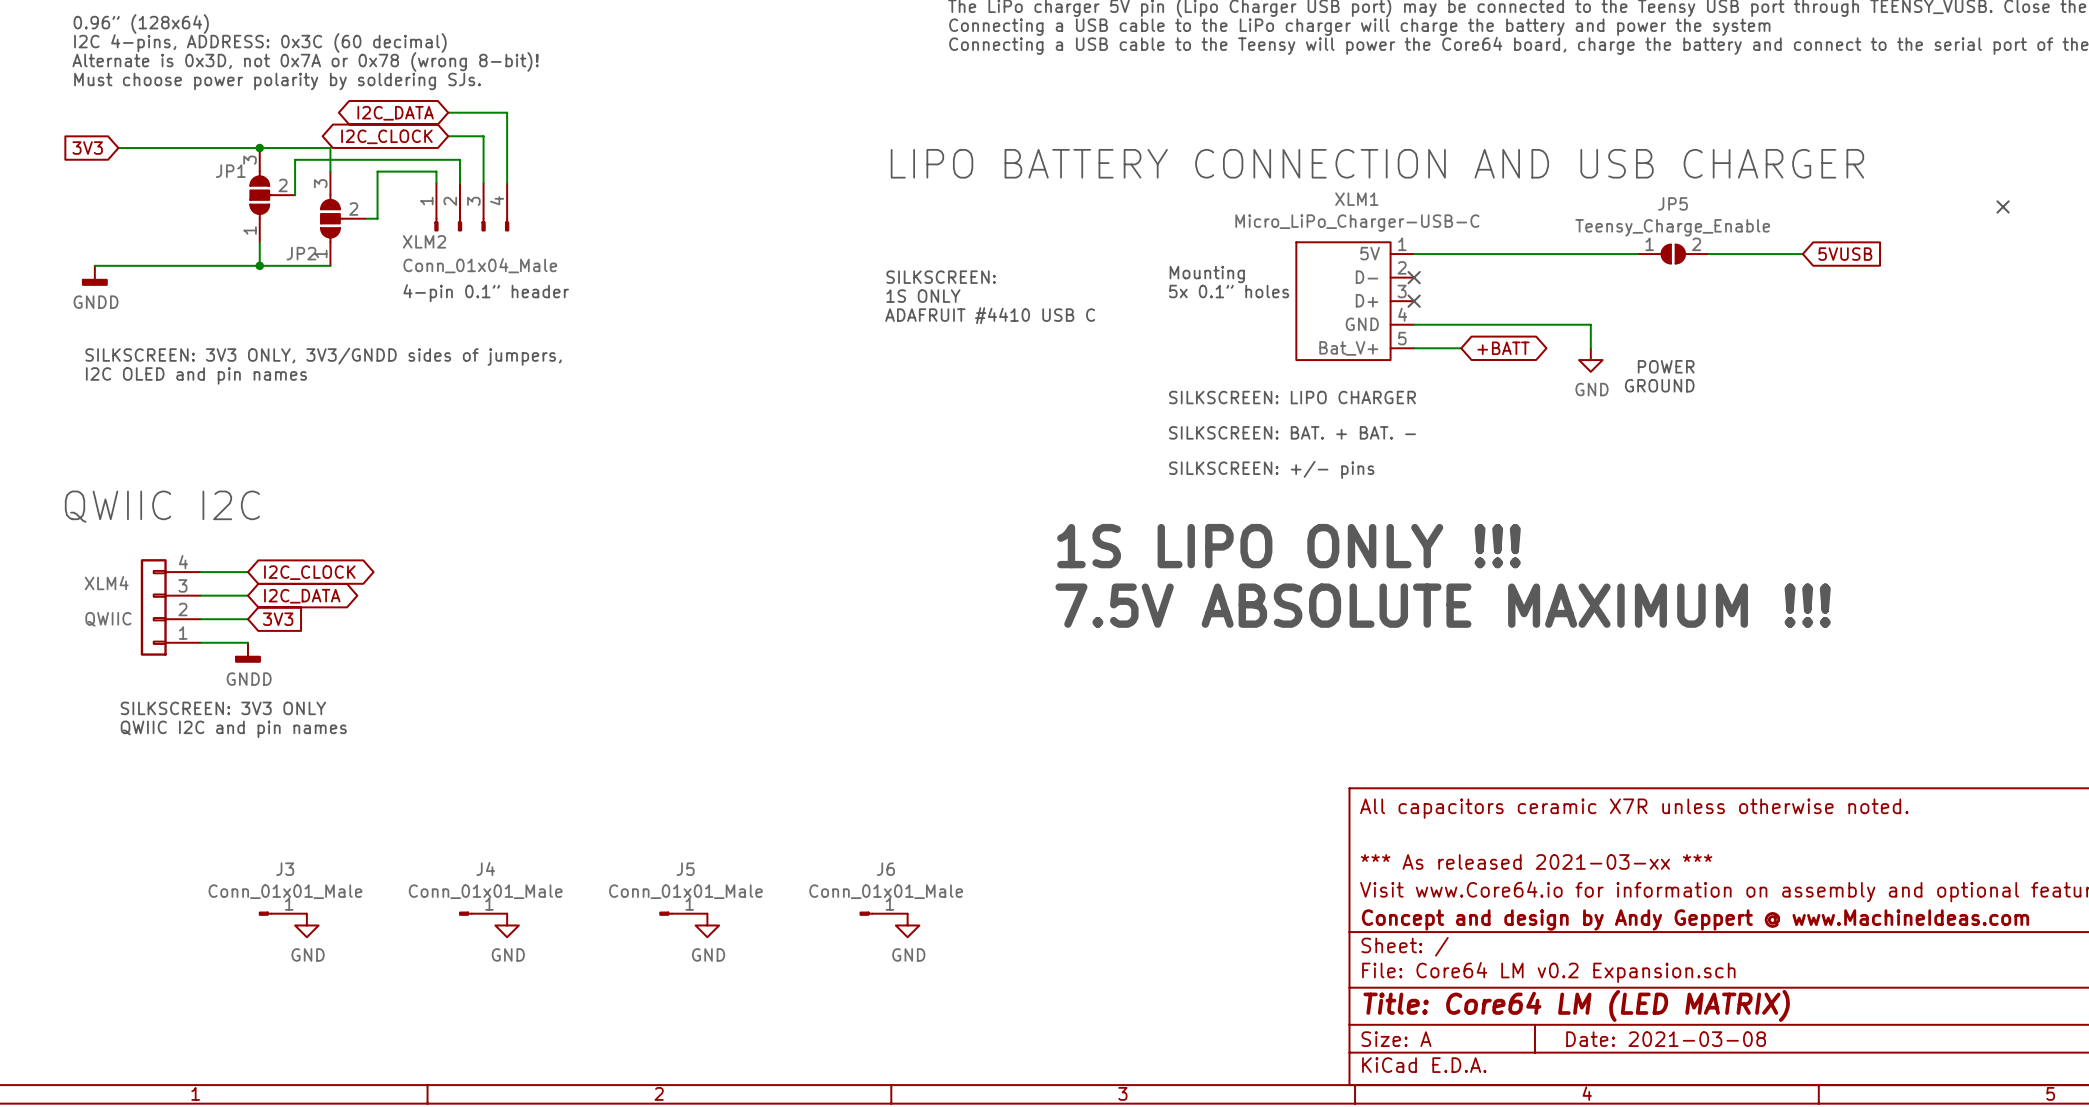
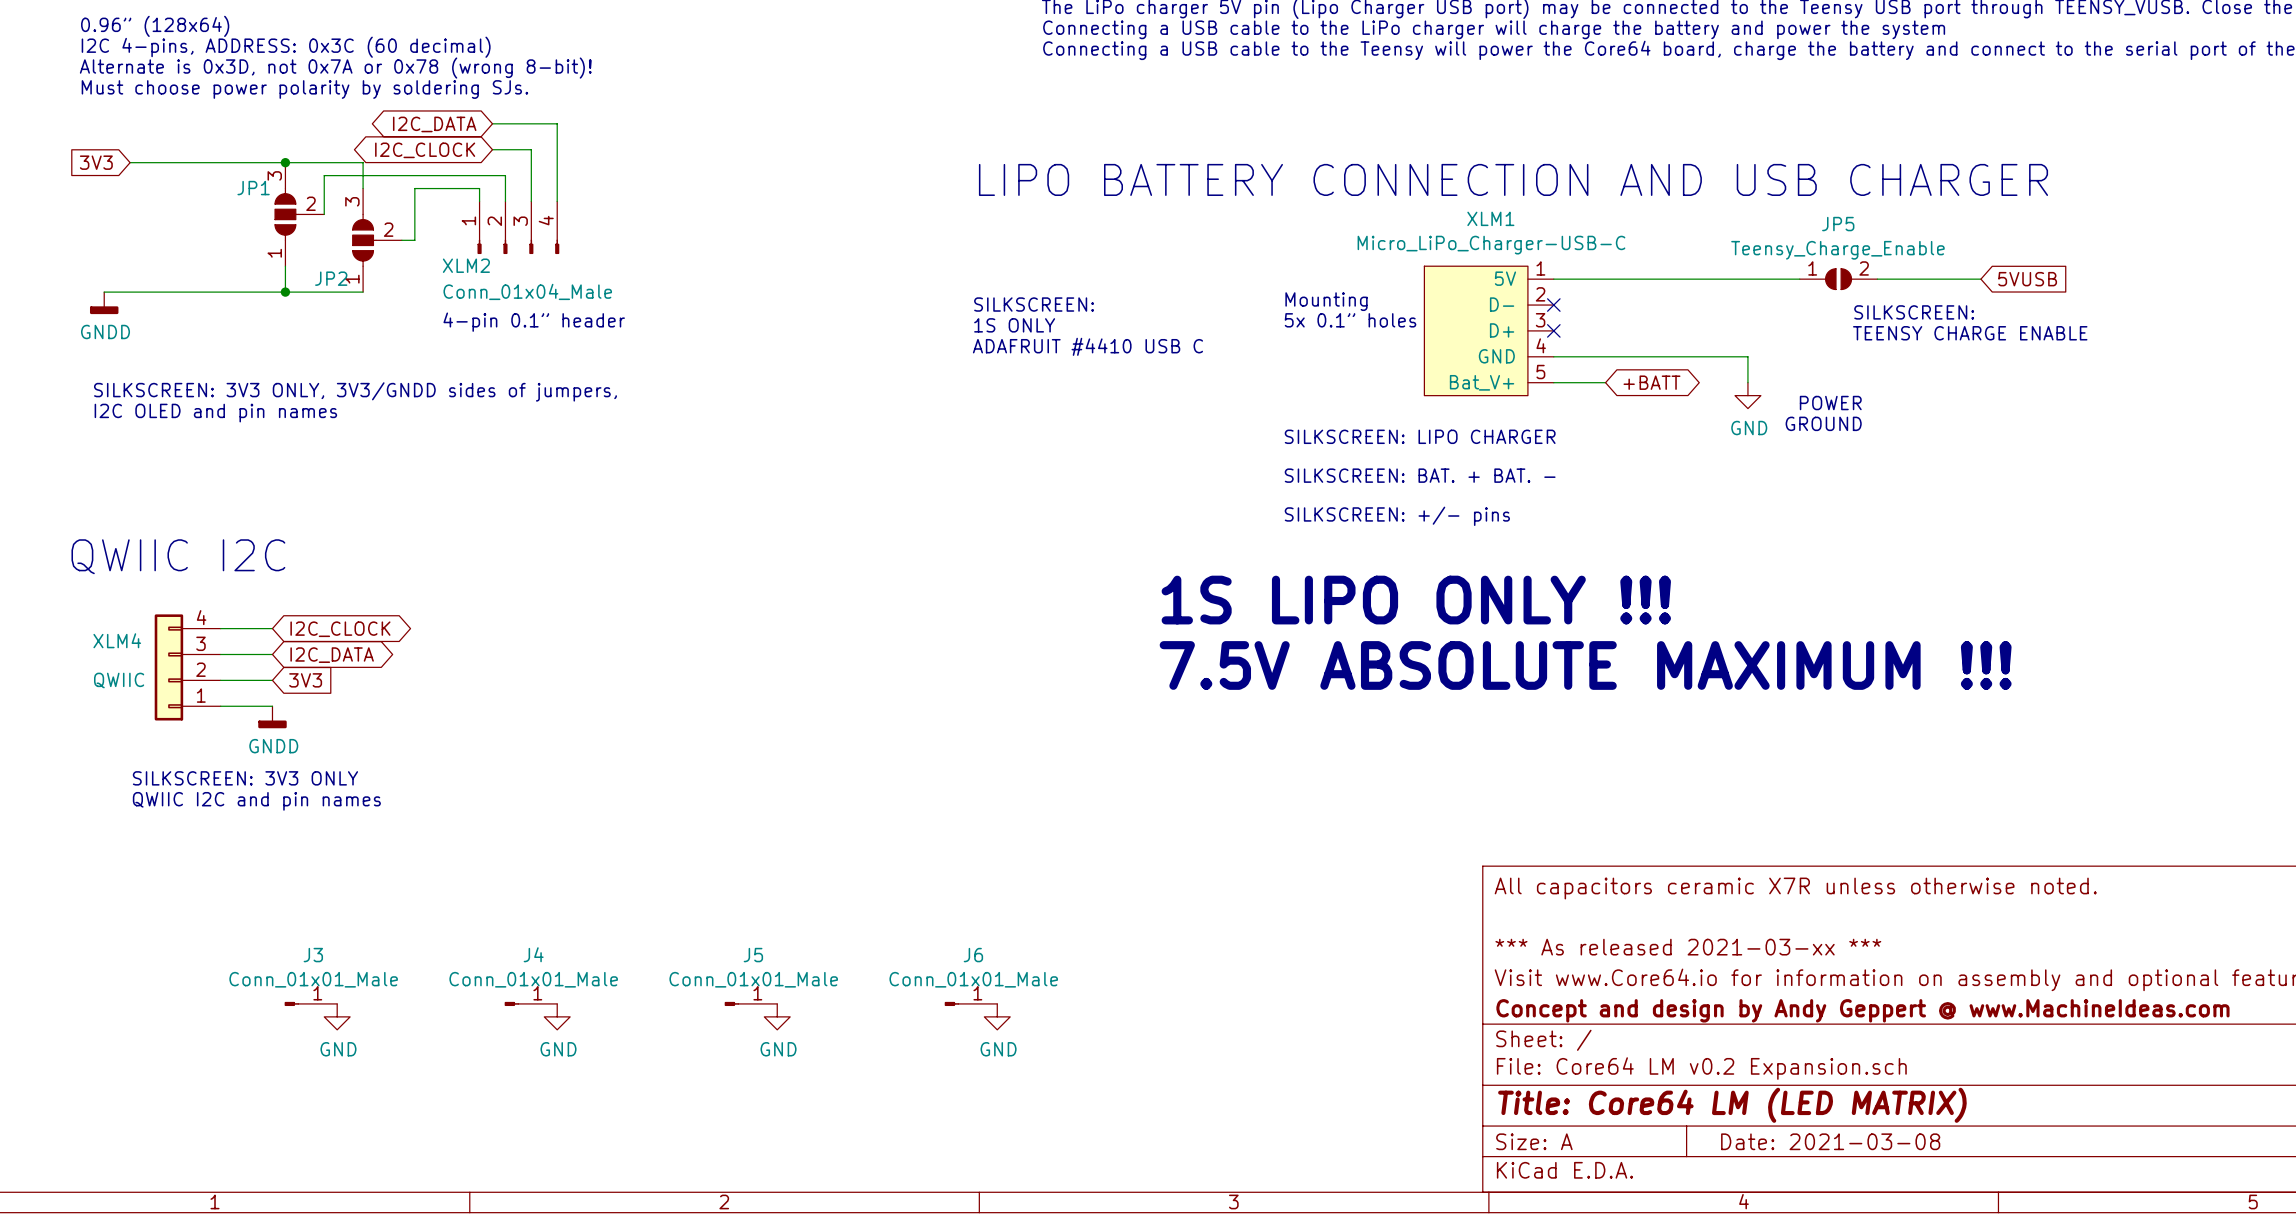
no-connect mark: (2003, 206) -> none
text: none -> SILKSCREEN: (1914, 312)
text: none -> TEENSY CHARGE ENABLE (1970, 333)

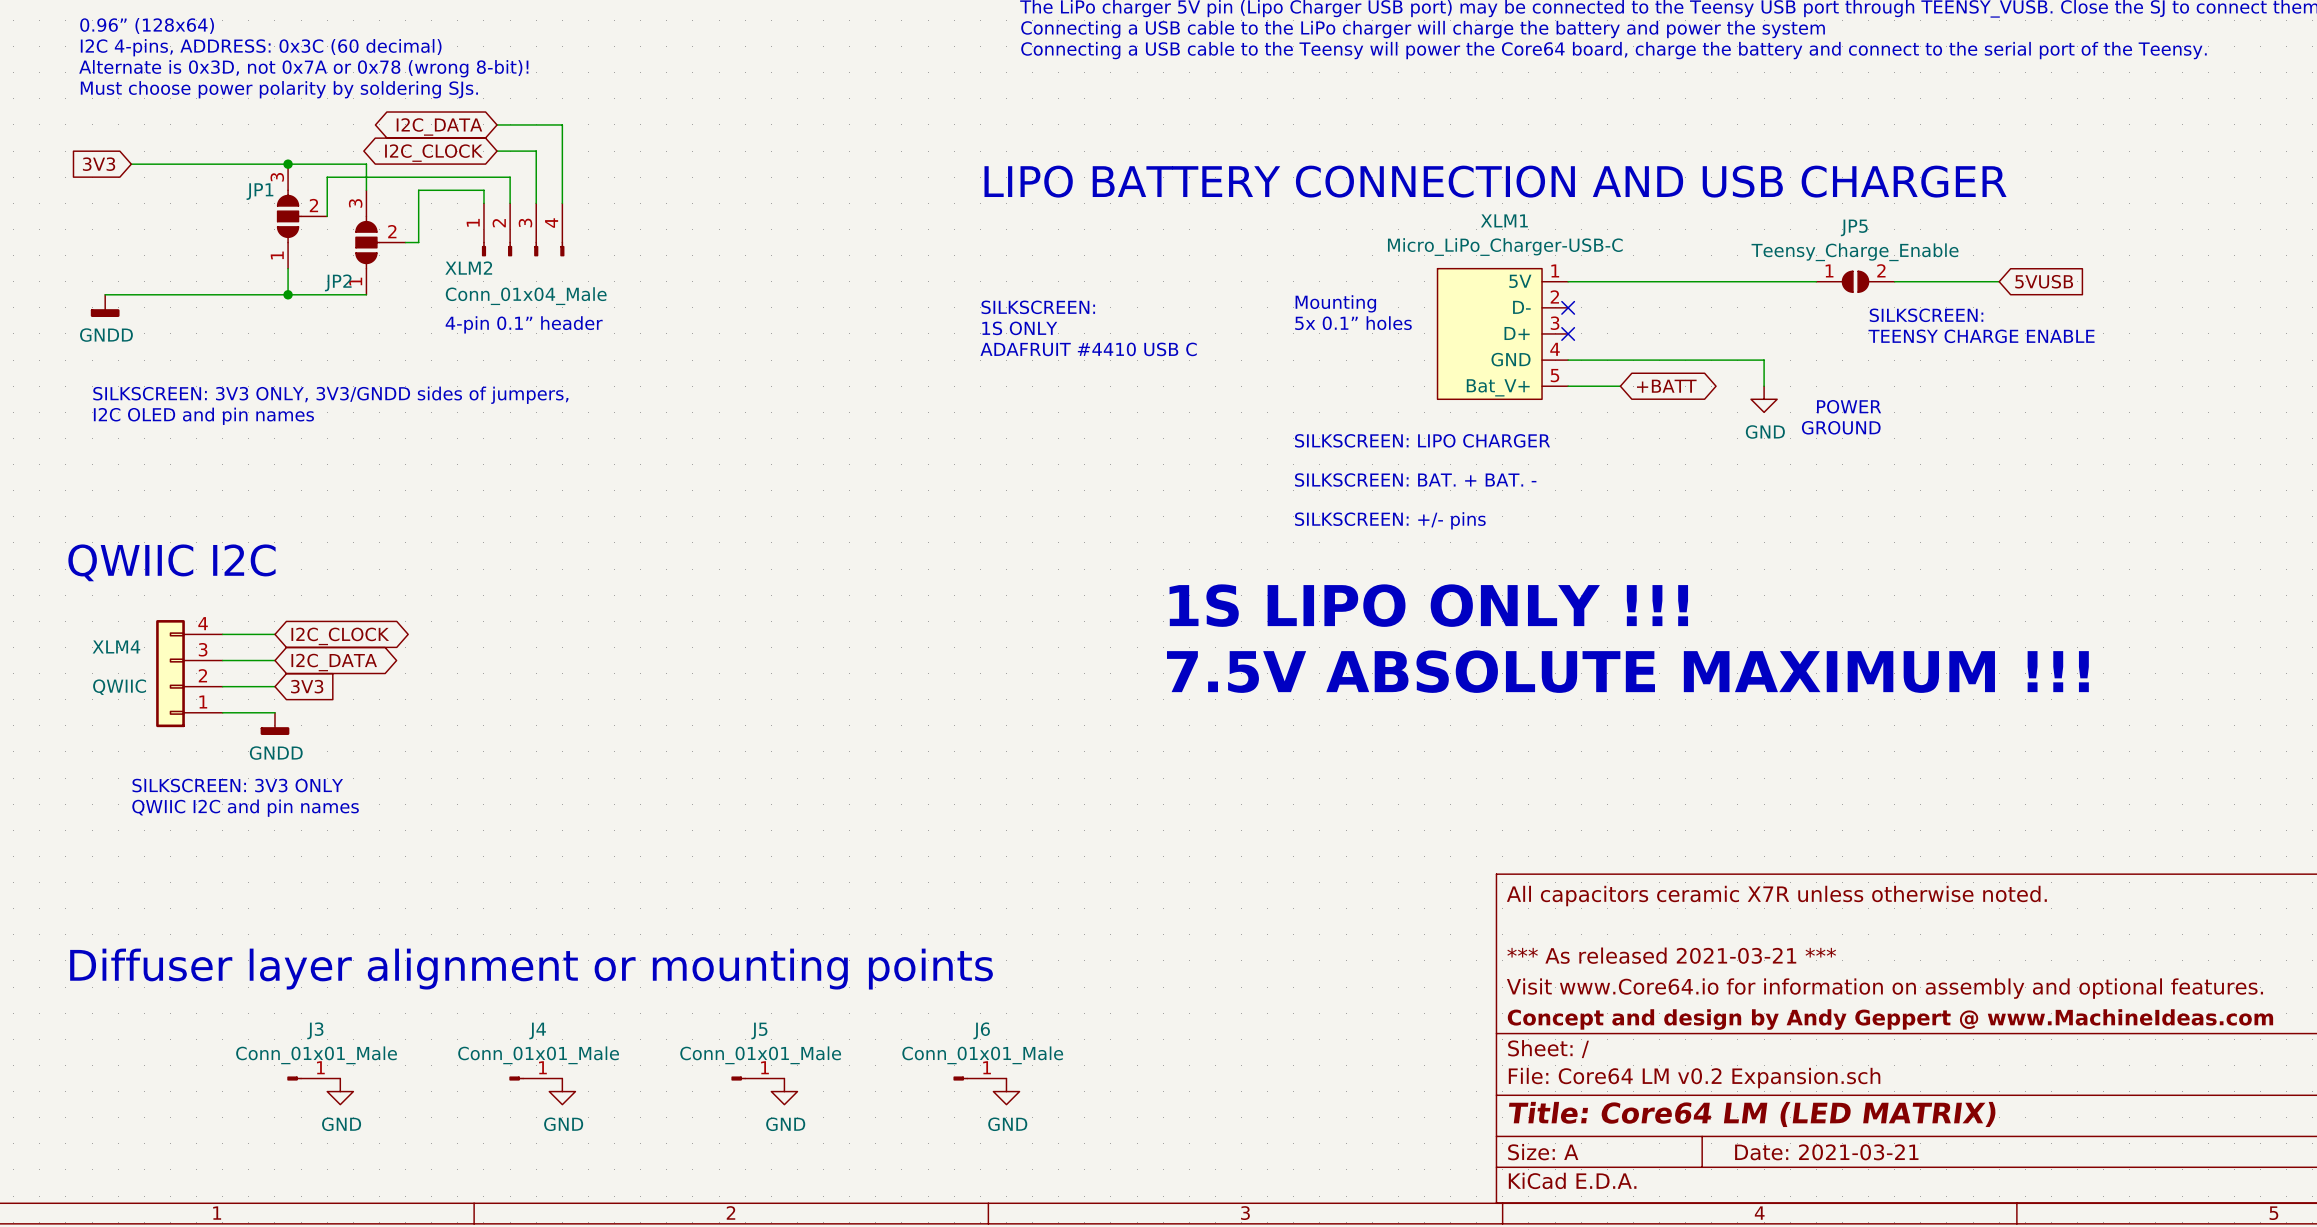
title block: *** As released 2021-03-xx *** (1688, 947) -> *** As released 2021-03-21 *** (1671, 955)
text: none -> Diffuser layer alignment or mounting points (531, 969)
J3 position: (310, 1003) -> (313, 1078)
J4 position: (530, 1003) -> (535, 1078)
J5 position: (750, 1003) -> (757, 1078)
J6 position: (971, 1003) -> (979, 1078)
power symbol position: GND (337, 1016) -> GND (340, 1091)
power symbol position: GND (557, 1016) -> GND (562, 1091)
power symbol position: GND (777, 1016) -> GND (784, 1091)
power symbol position: GND (997, 1016) -> GND (1006, 1091)
title block: Date: 2021-03-08 (1830, 1141) -> Date: 2021-03-21 (1826, 1152)

